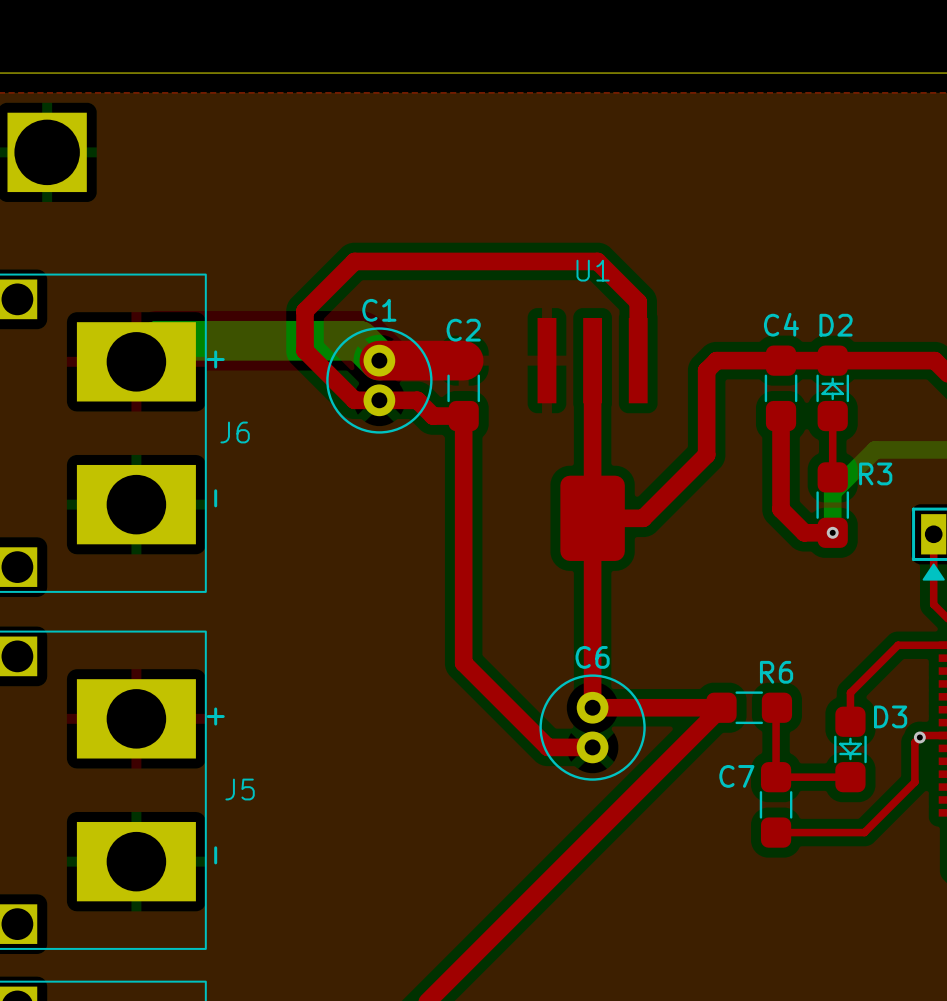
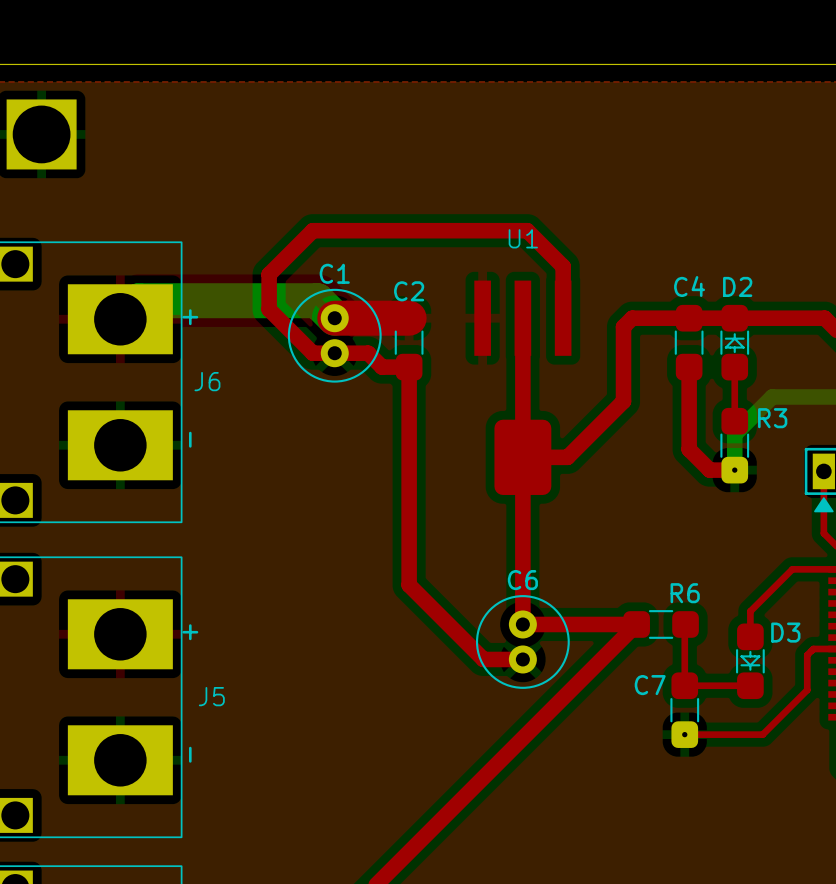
R3 footprint: [816, 462, 850, 548] -> [720, 407, 750, 484]
via: (832, 532) -> none
via: (919, 737) -> none
C7 footprint: [759, 762, 793, 848] -> [670, 672, 700, 748]

